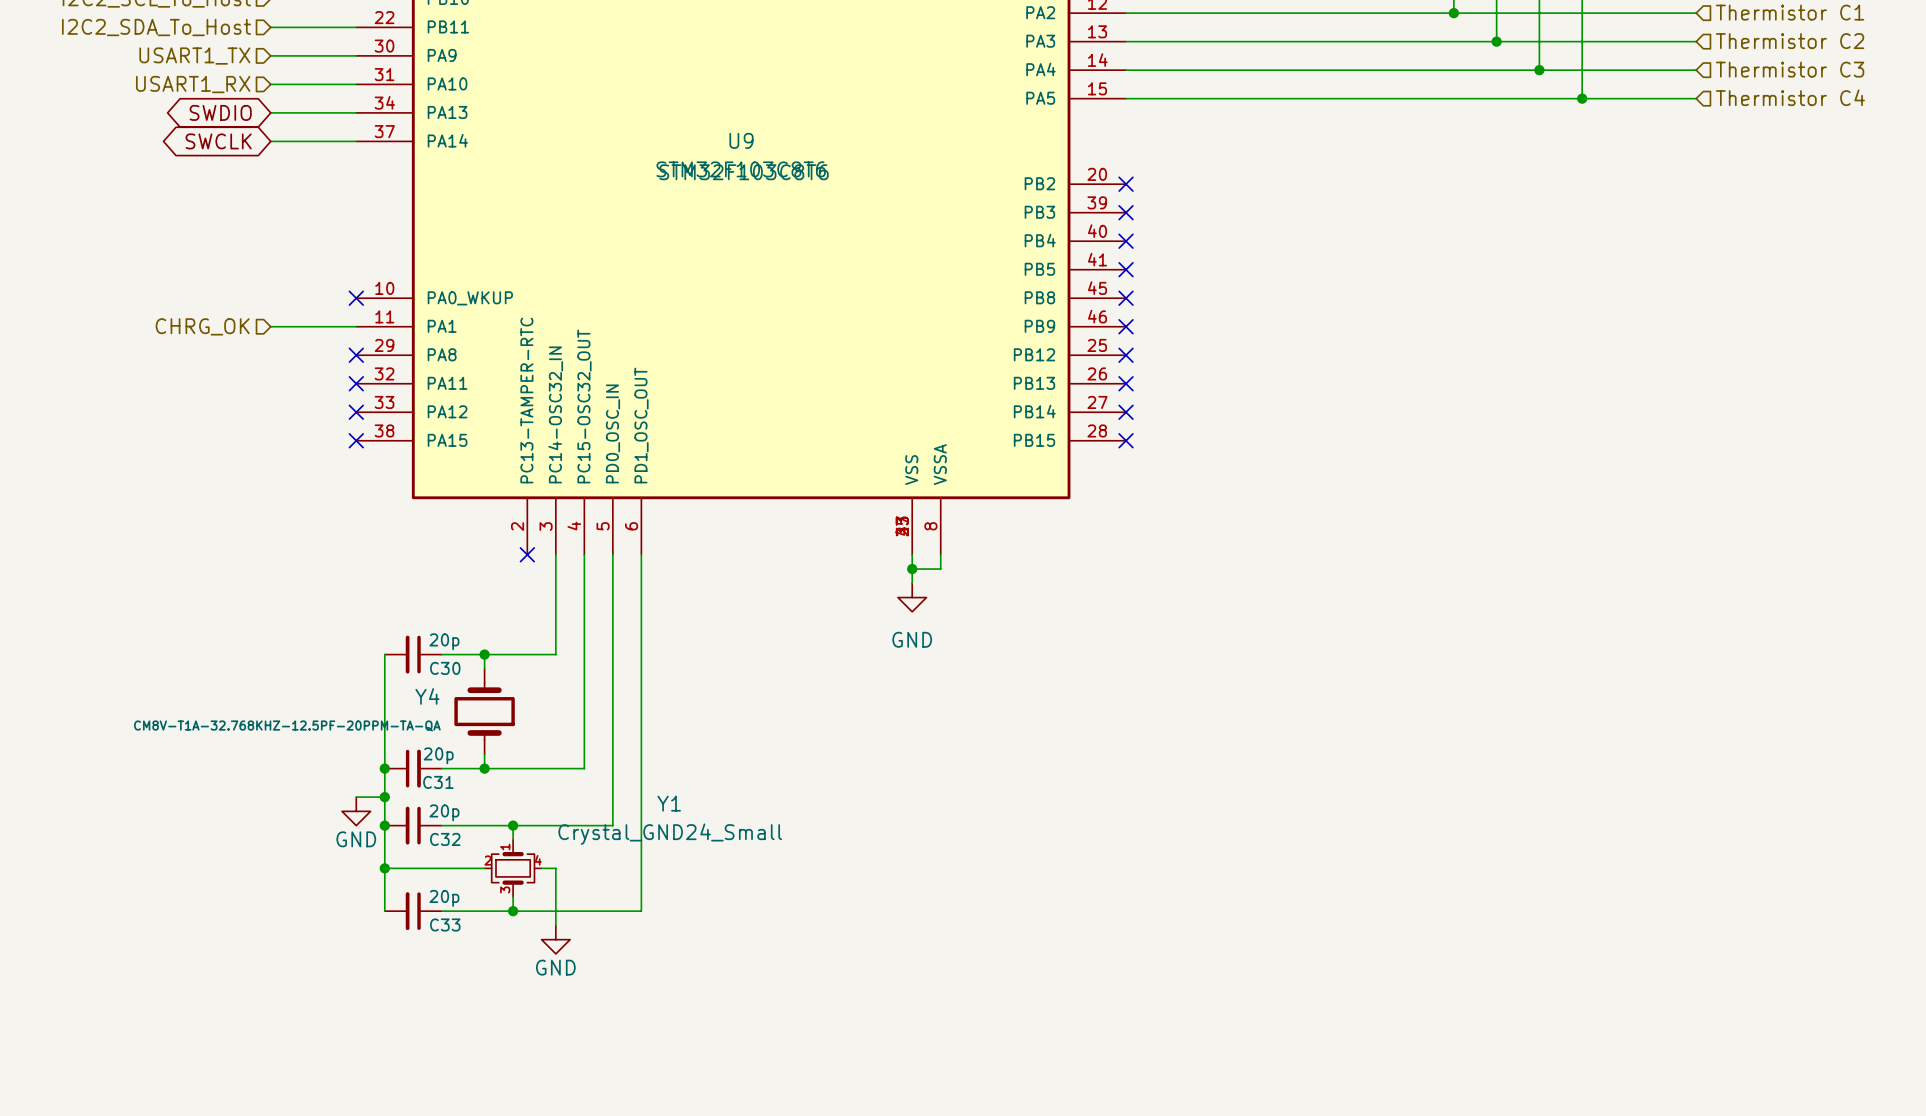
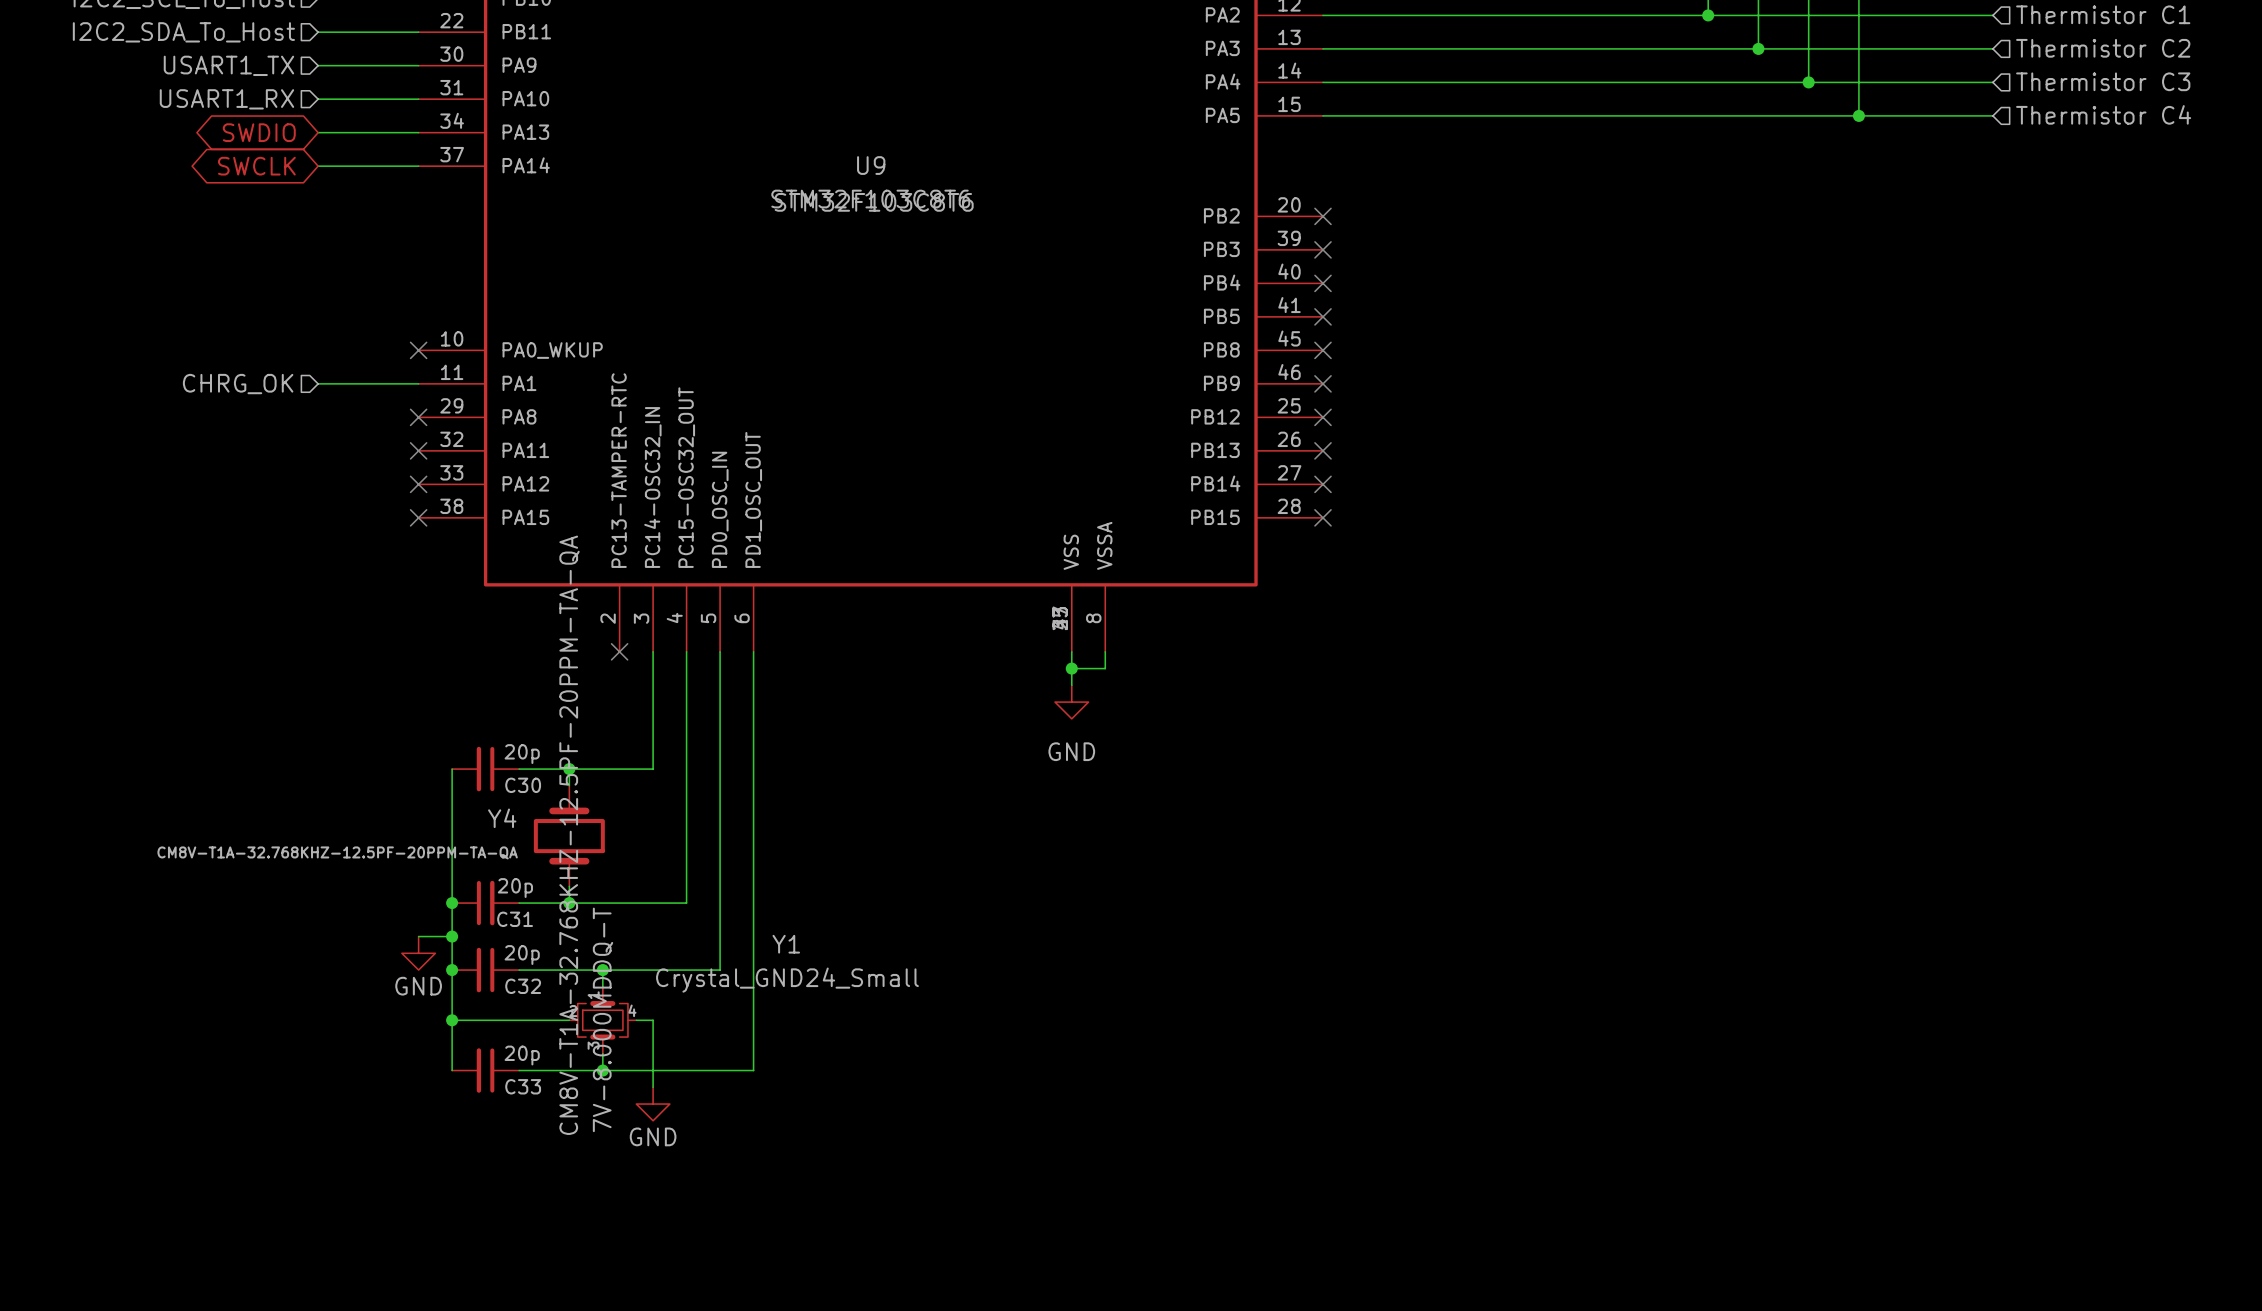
Y4 text: none -> CM8V-T1A-32.768KHZ-12.5PF-20PPM-TA-QA (569, 835)
Y1 text: none -> 7V-8.000MDDQ-T (603, 1019)

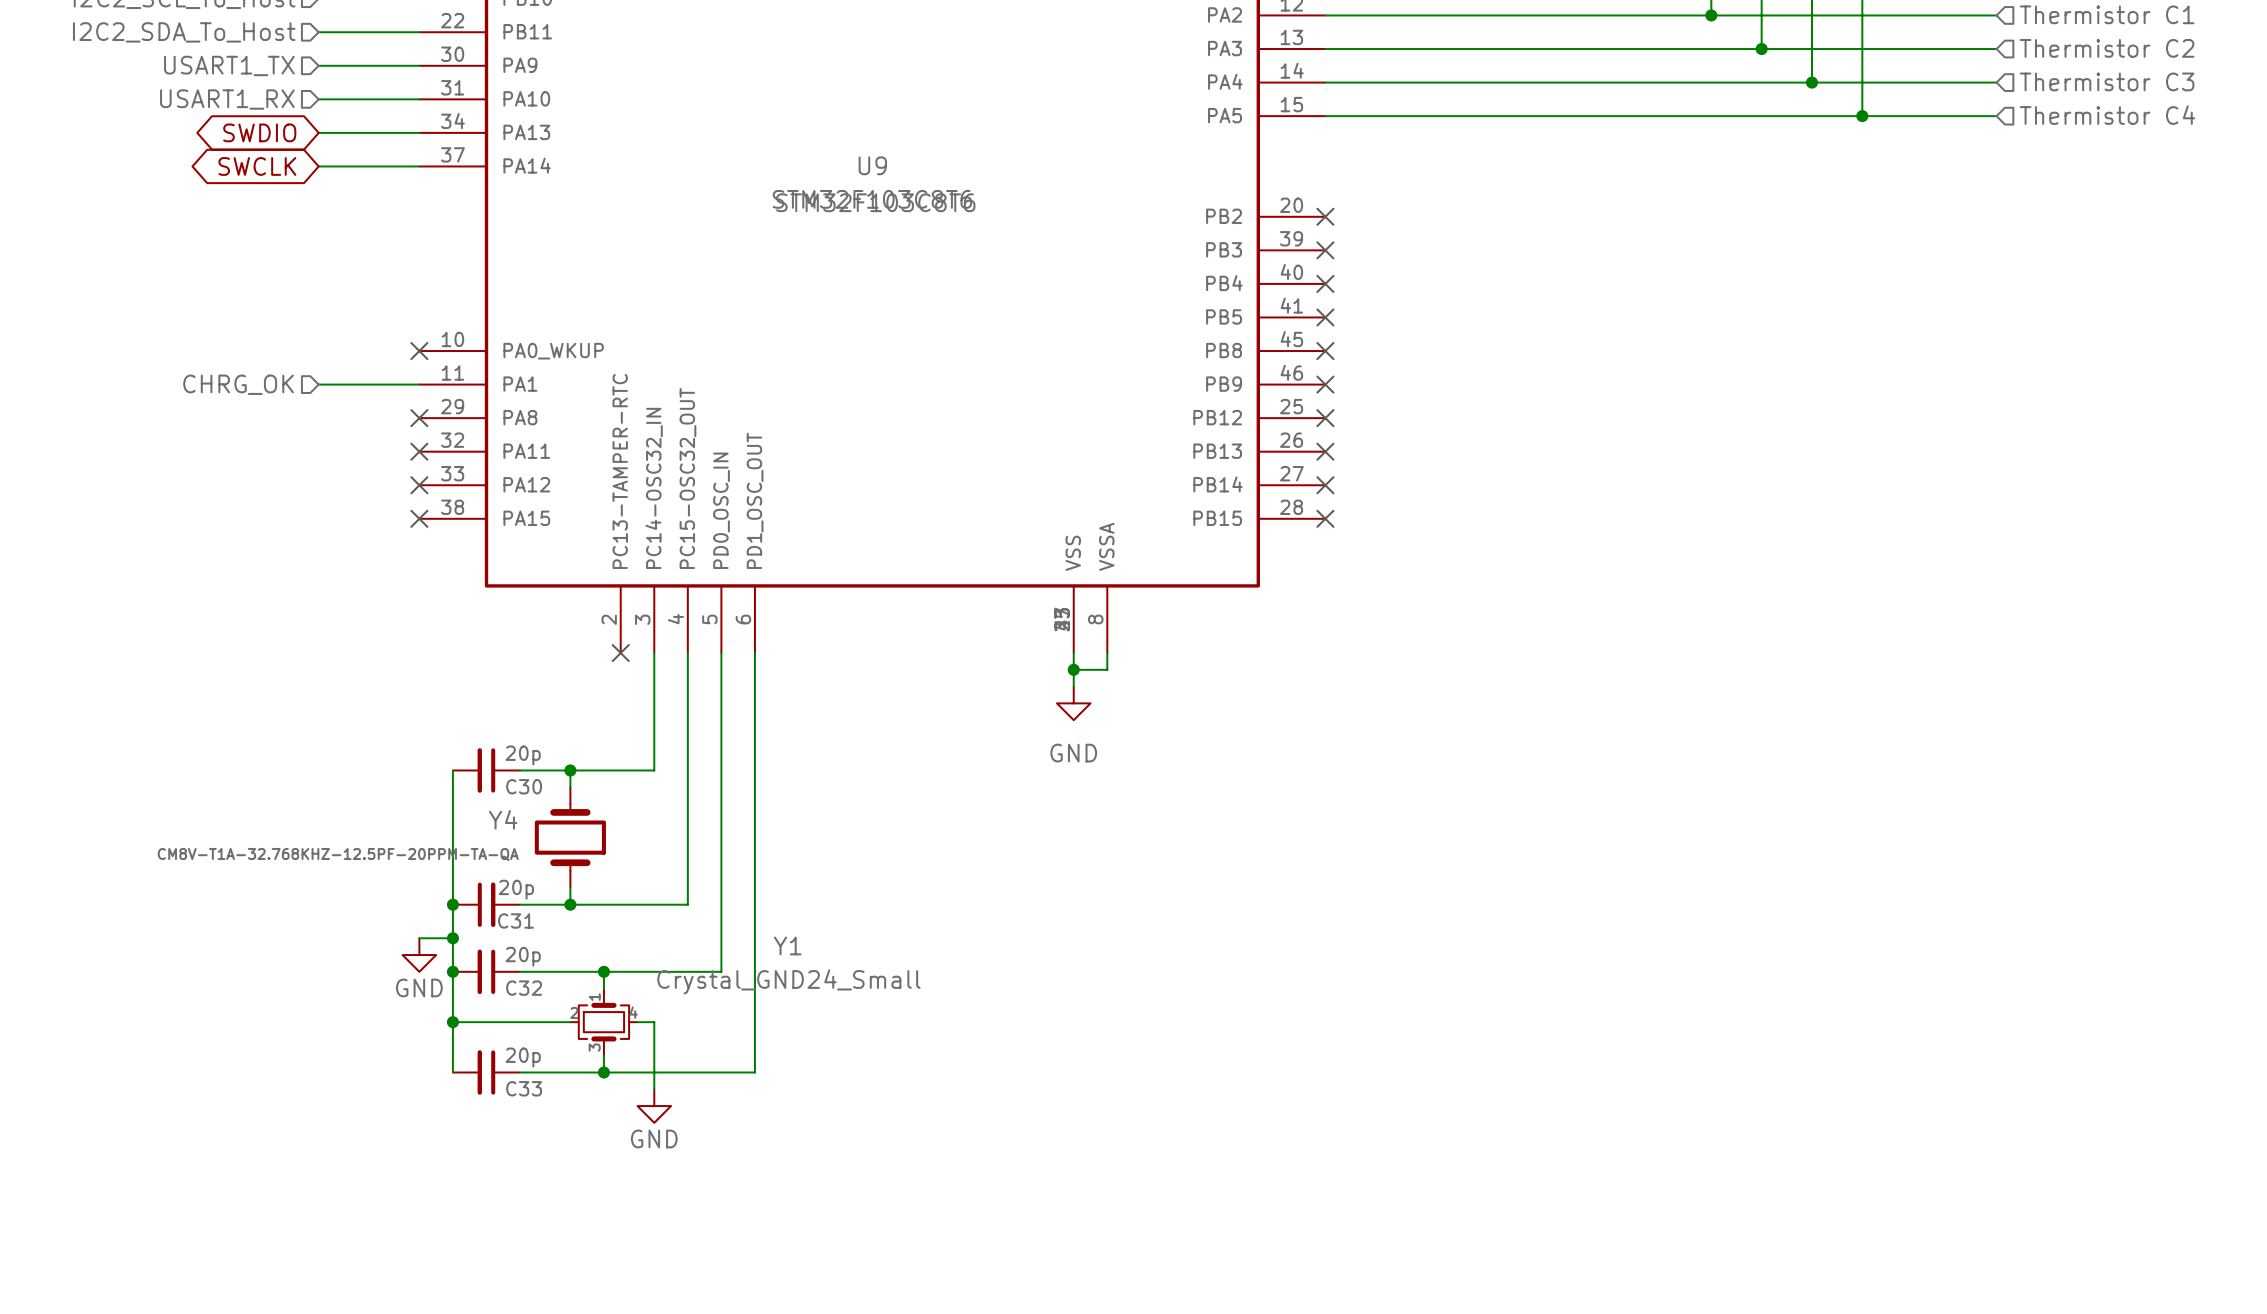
Y4 text: CM8V-T1A-32.768KHZ-12.5PF-20PPM-TA-QA (569, 835) -> none
Y1 text: 7V-8.000MDDQ-T (603, 1019) -> none

